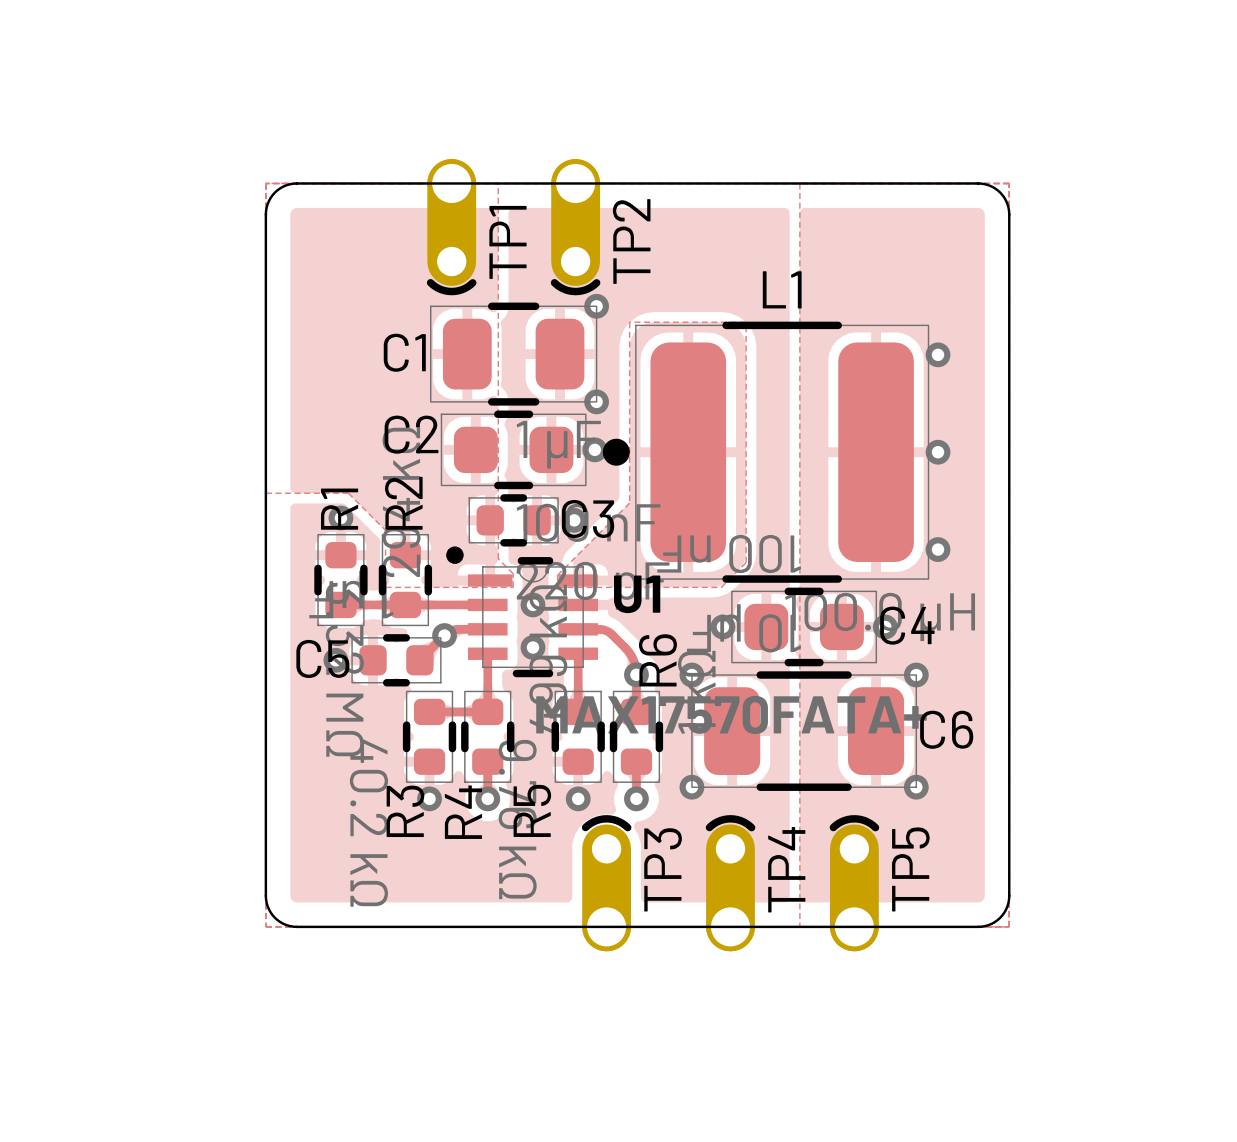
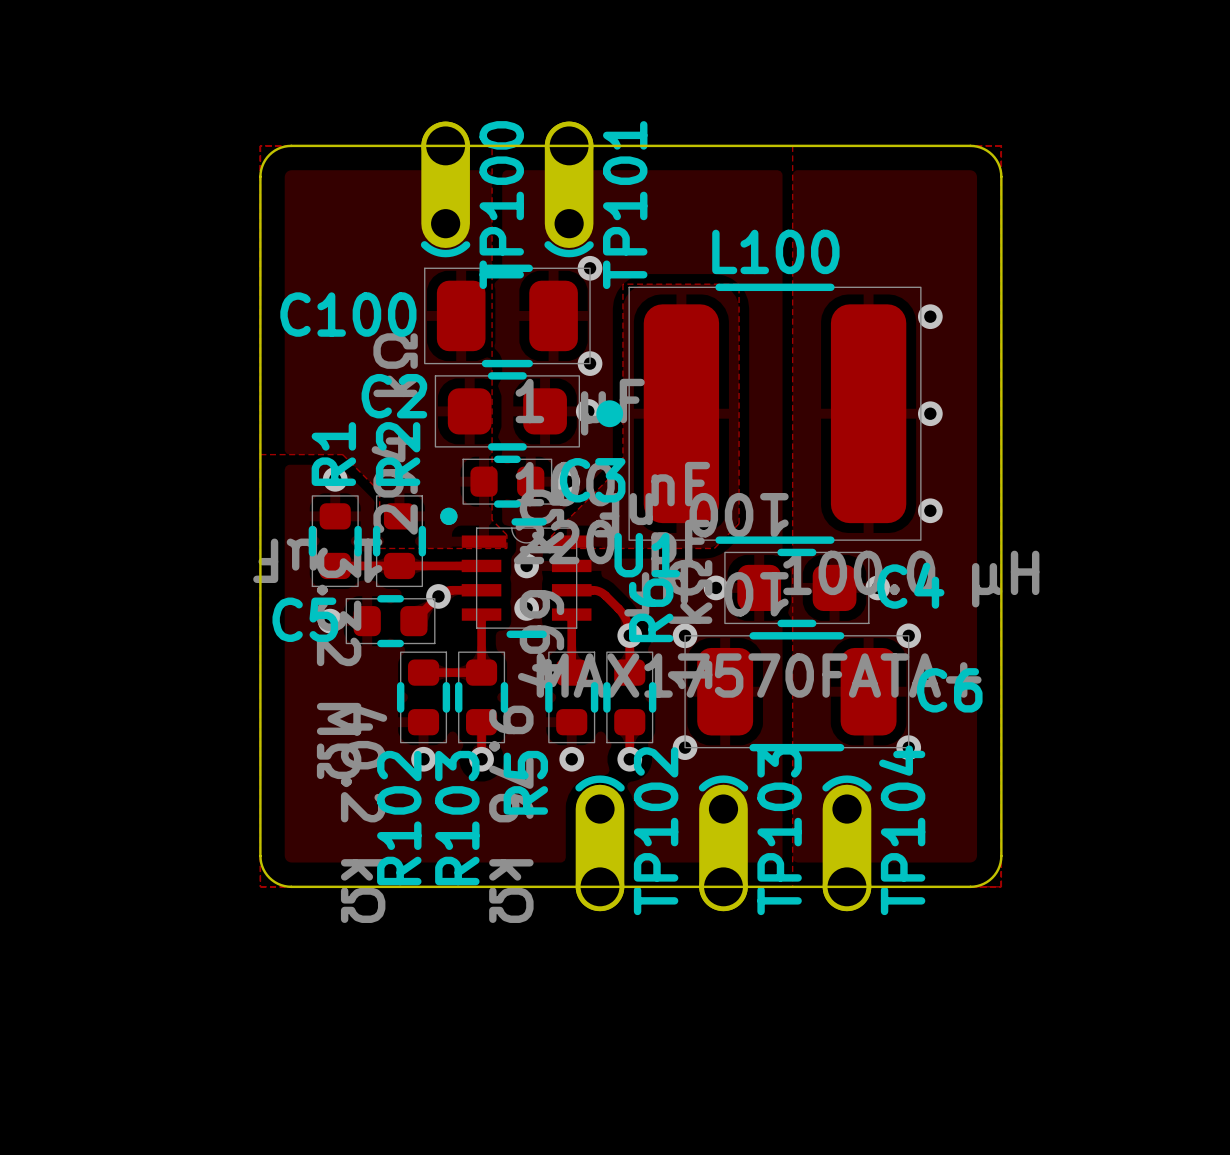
TP2 name: TP2 (631, 241) -> TP101 (625, 205)
TP1 name: TP1 (507, 242) -> TP100 (501, 205)
L1 name: L1 (782, 289) -> L100 (775, 251)
C1 name: C1 (404, 352) -> C100 (348, 314)
R3 name: R3 (405, 811) -> R102 (399, 818)
R4 name: R4 (463, 812) -> R103 (457, 818)
TP3 name: TP3 (663, 869) -> TP102 (656, 831)
TP4 name: TP4 (786, 869) -> TP103 (779, 831)
TP5 name: TP5 (910, 869) -> TP104 (902, 830)

